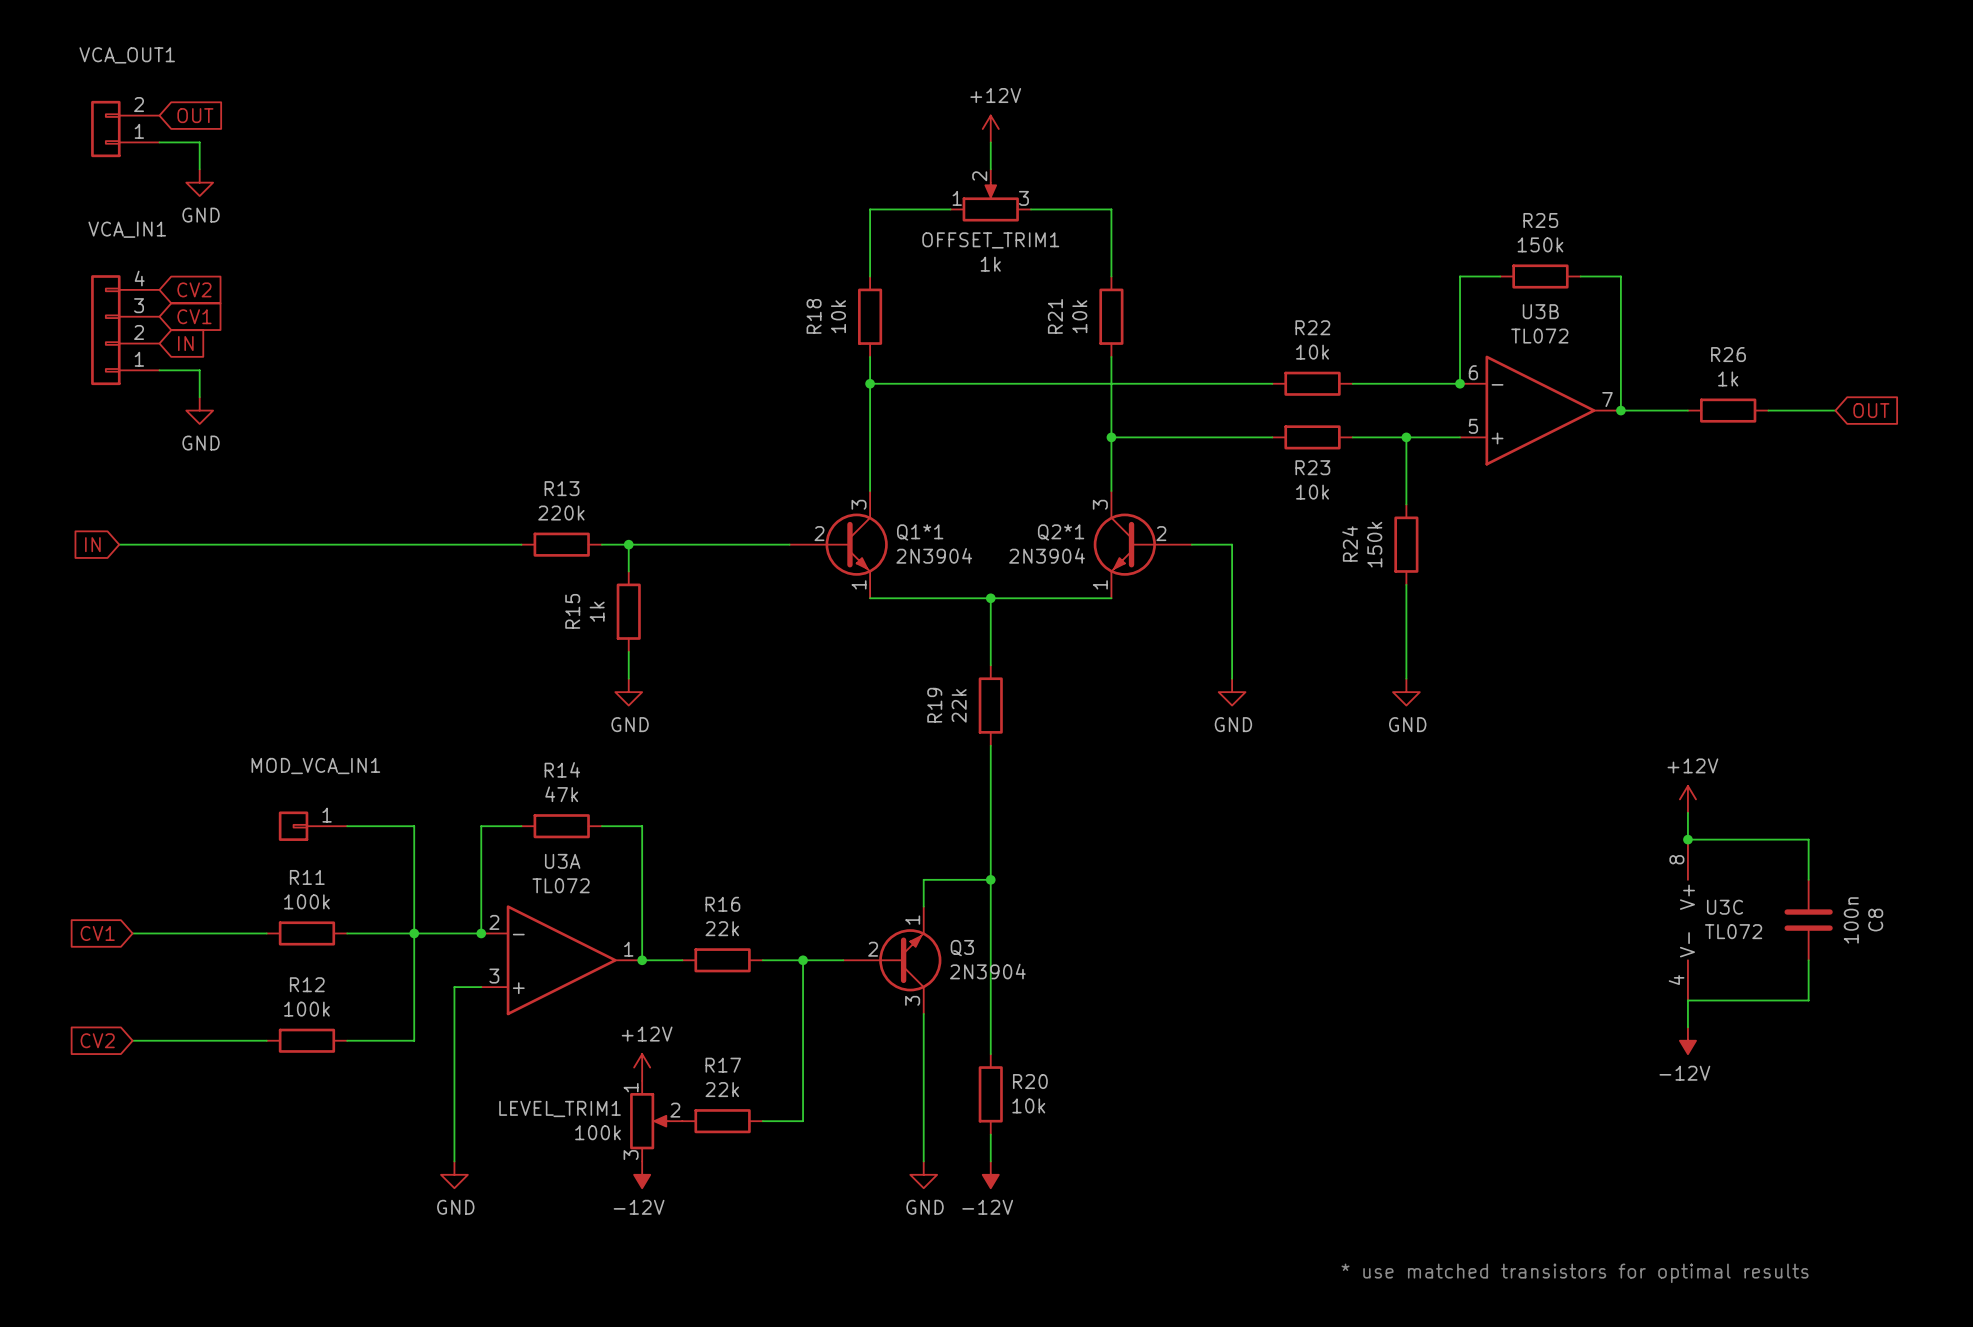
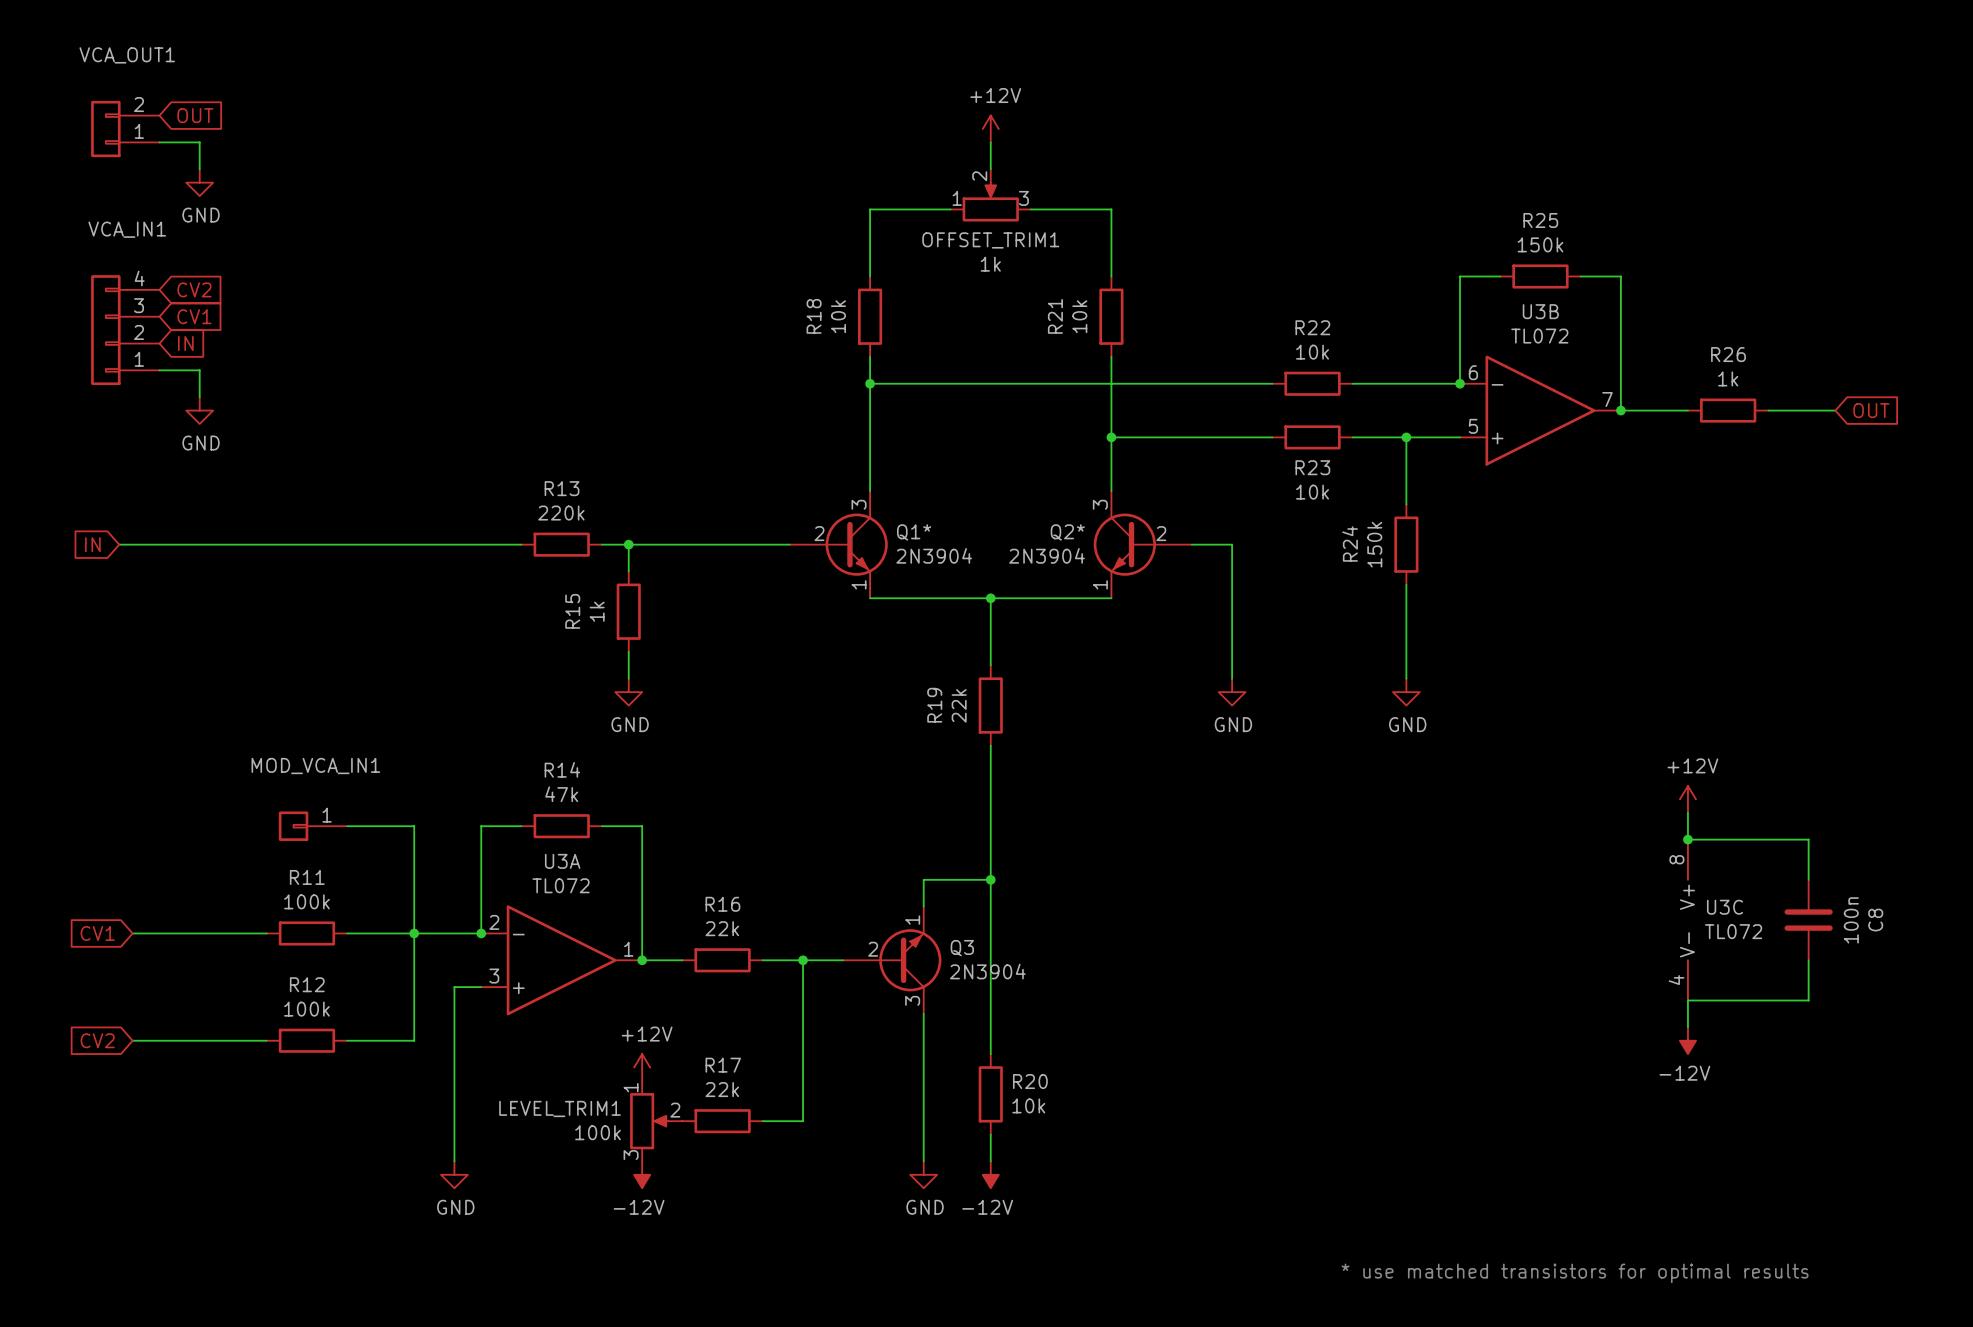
Q1*1 name: Q1*1 (920, 532) -> Q1* (914, 532)
Q2*1 name: Q2*1 (1061, 532) -> Q2* (1067, 532)

